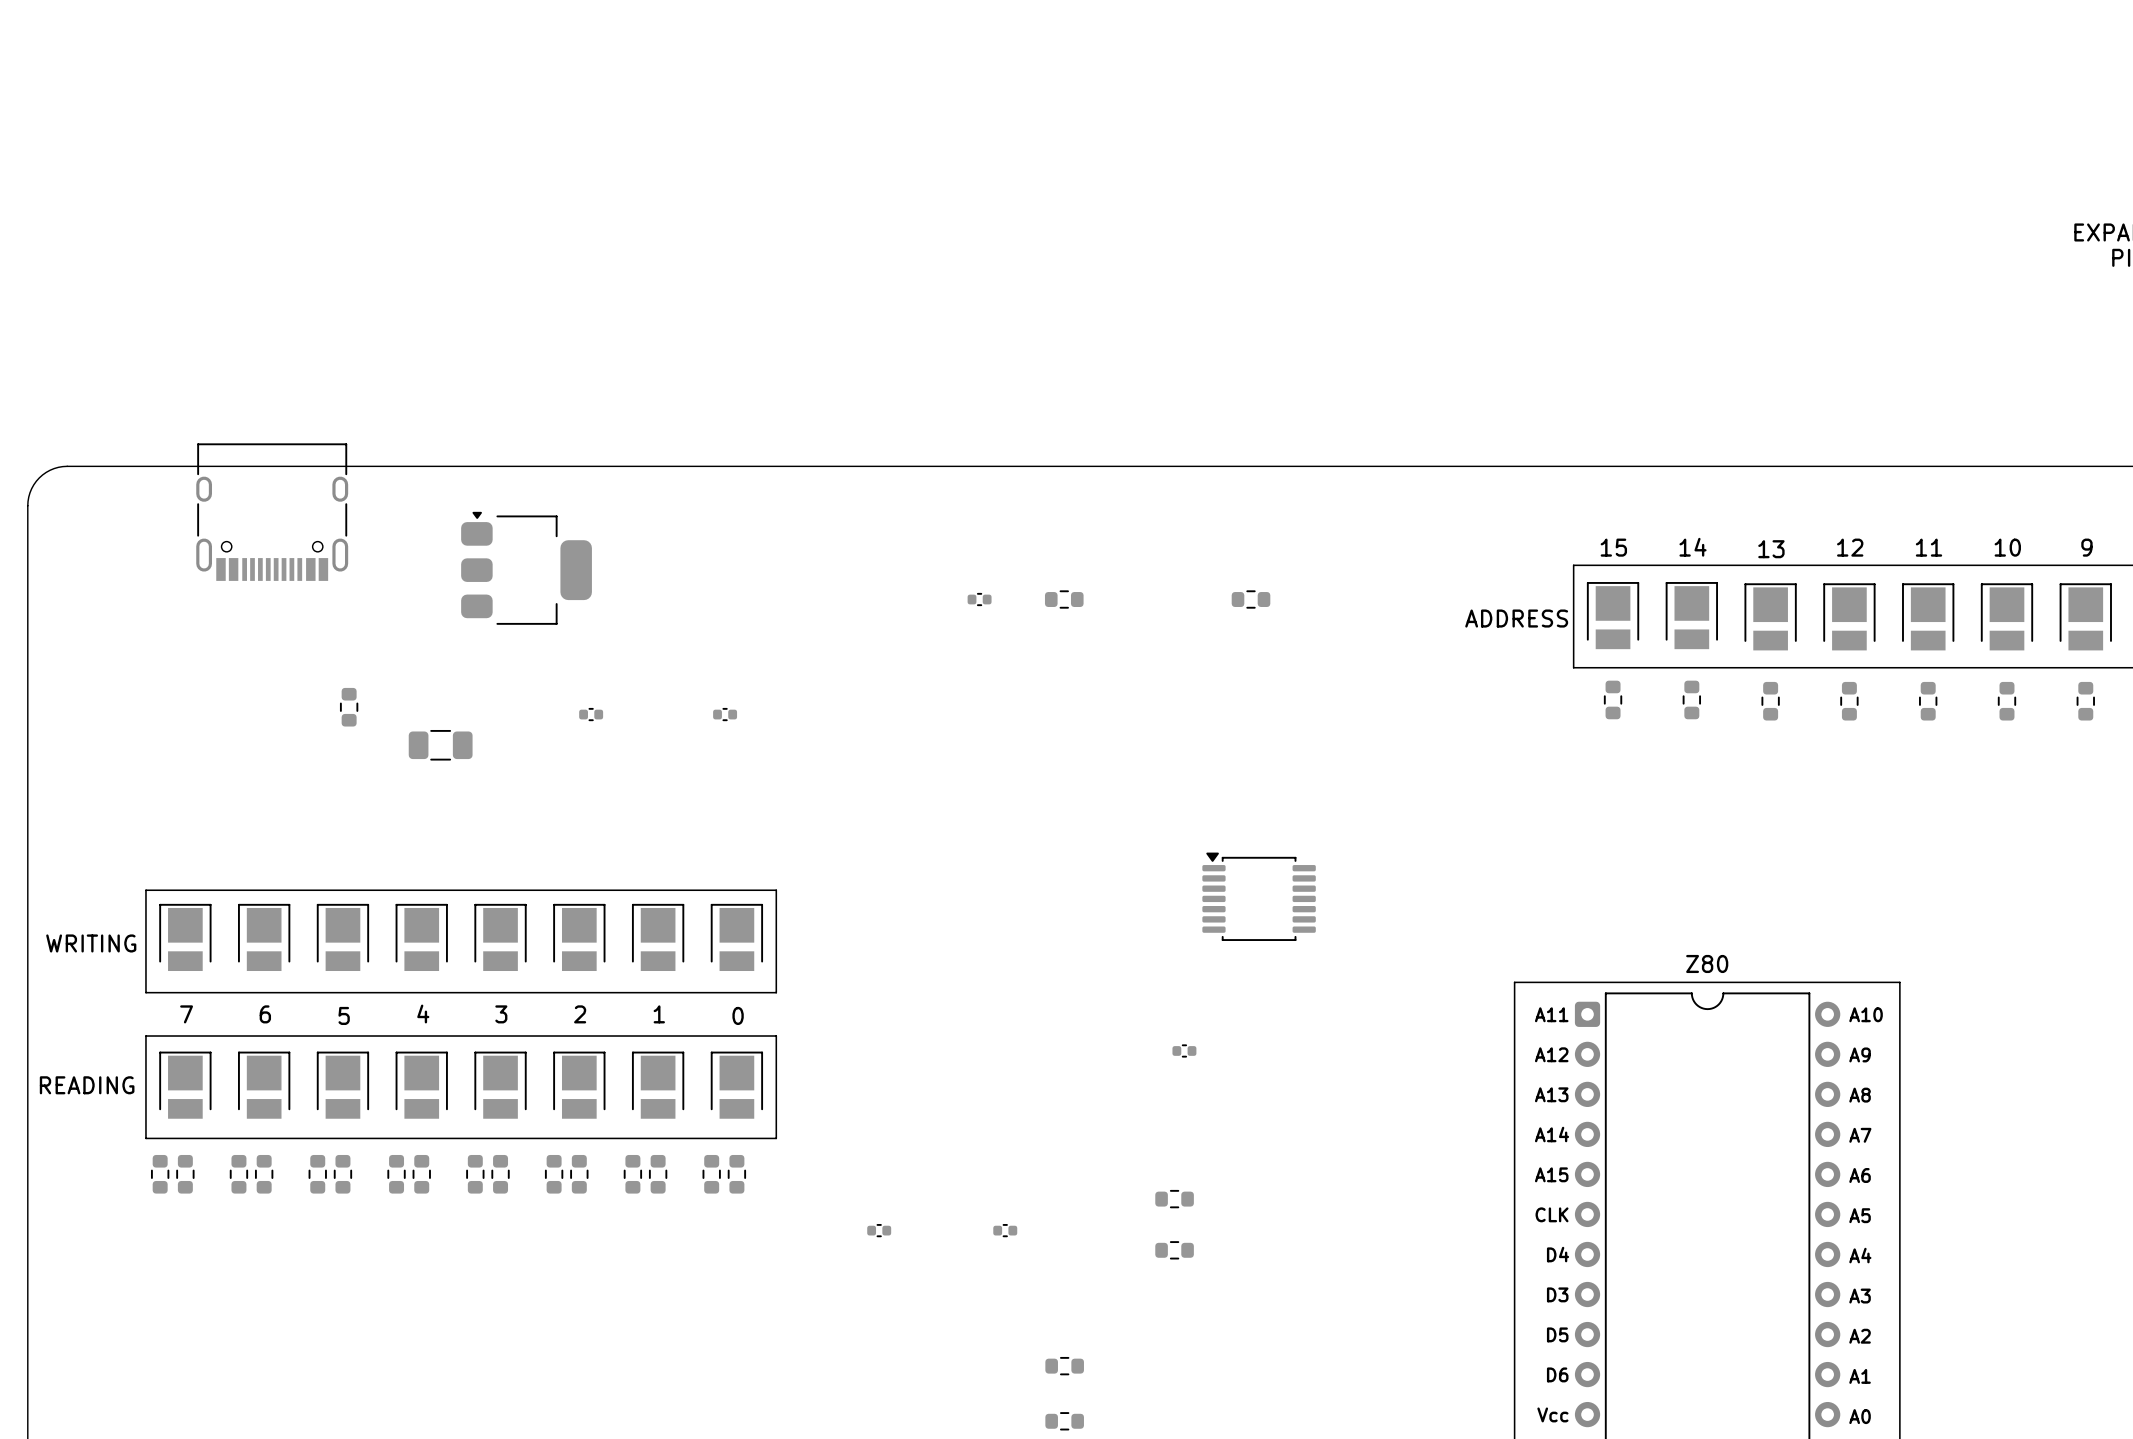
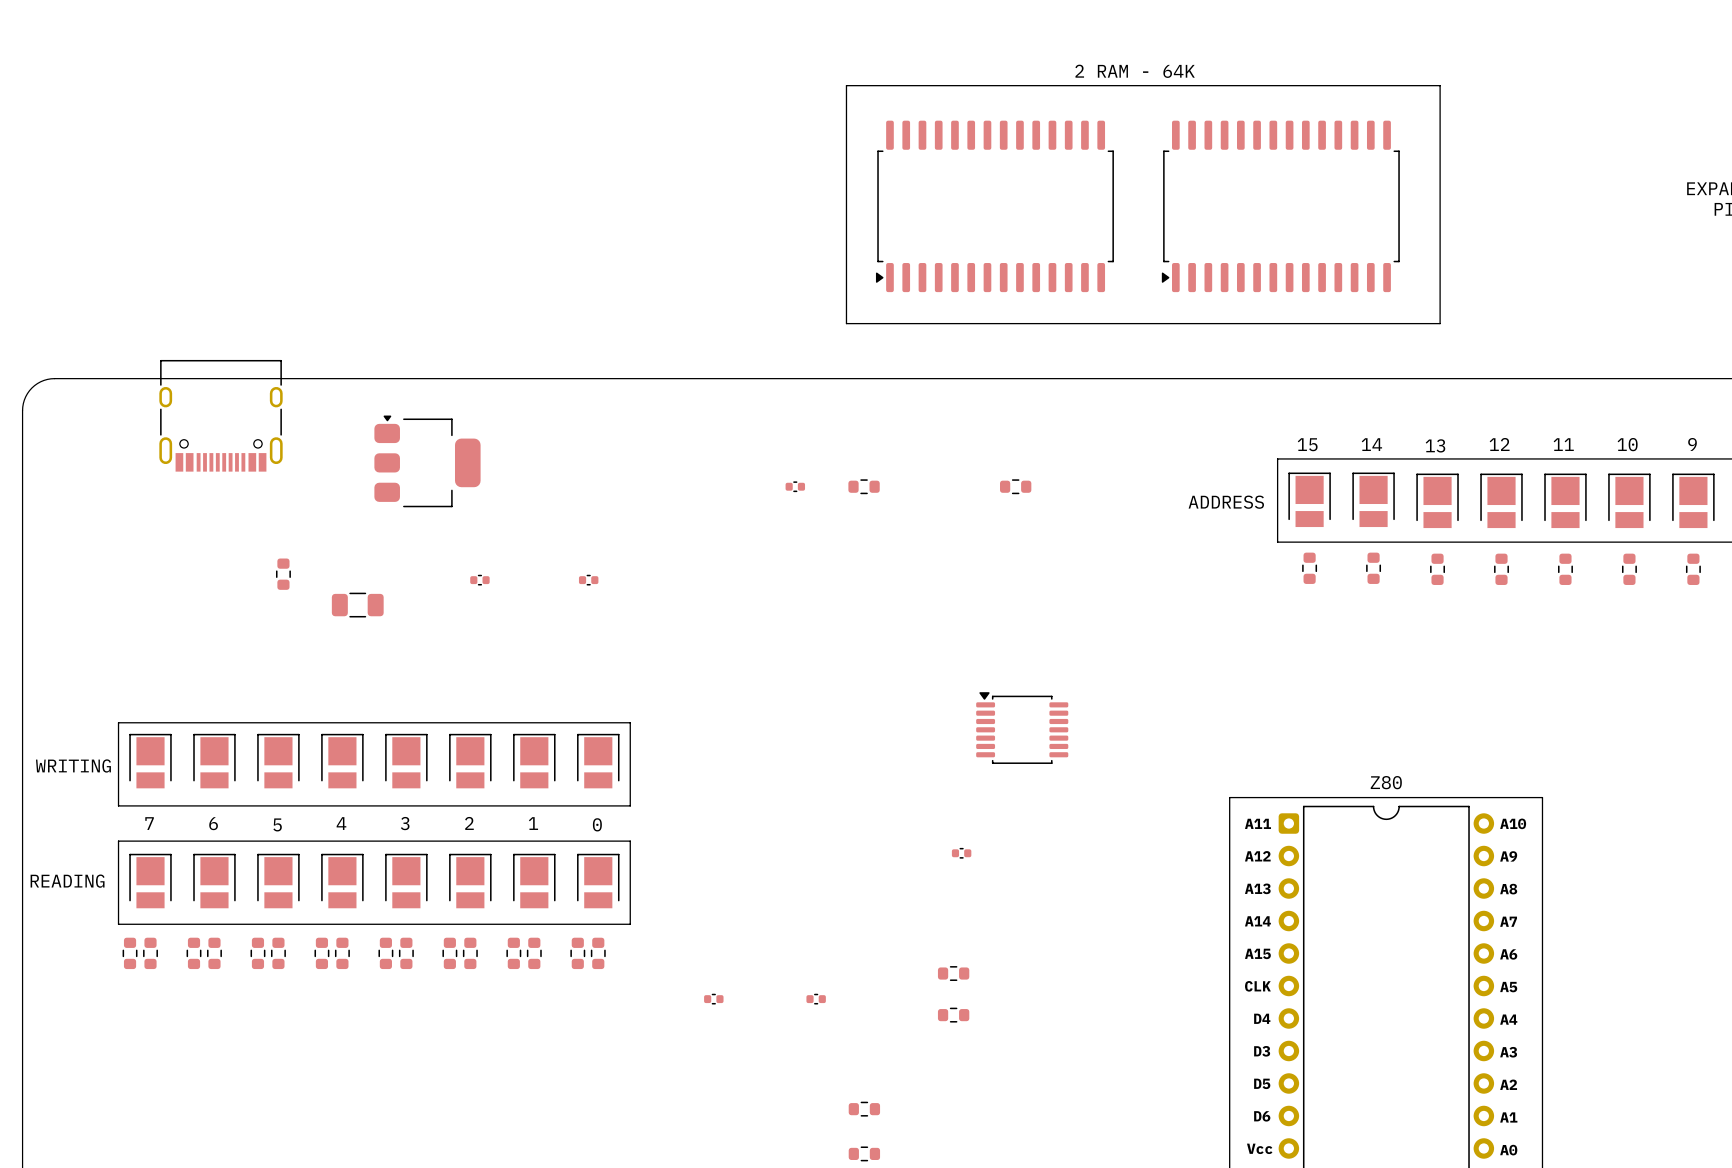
text: none -> 2 RAM - 64K (1135, 71)
line: none -> (846, 85) (1440, 85) (1440, 323) (846, 323) (846, 85)
part: none -> (994, 206)
part: none -> (1280, 206)

